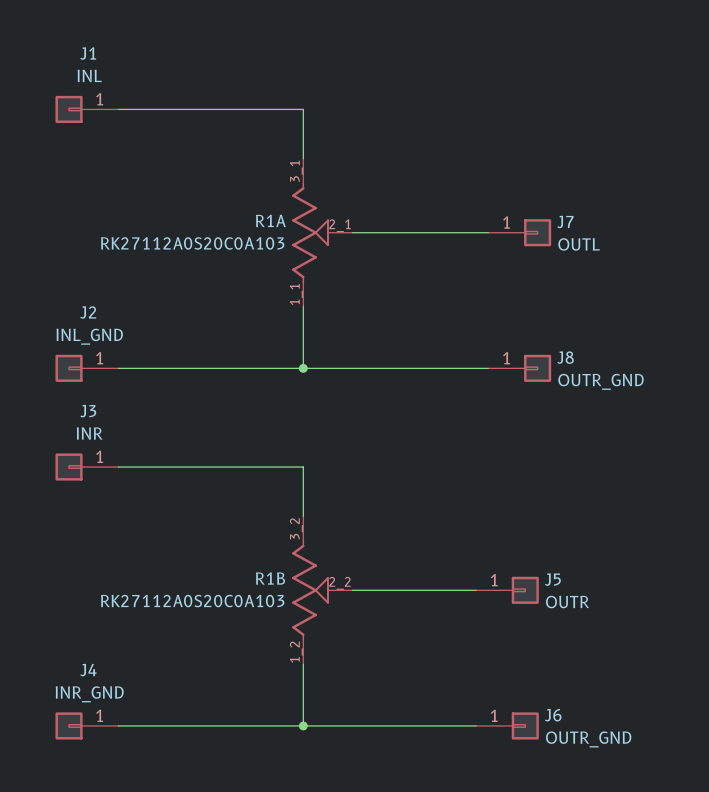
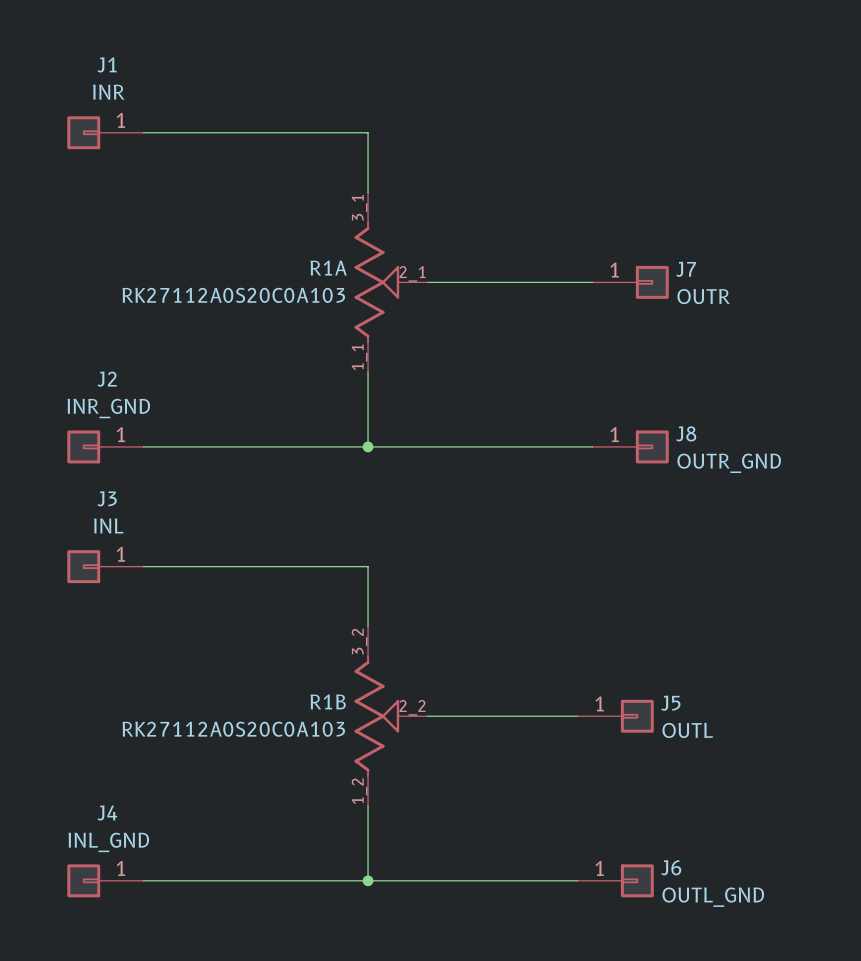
J1 value: INL (89, 75) -> INR (108, 92)
J7 value: OUTL (579, 244) -> OUTR (703, 296)
J2 value: INL_GND (89, 336) -> INR_GND (108, 408)
J3 value: INR (89, 433) -> INL (108, 525)
J5 value: OUTR (567, 602) -> OUTL (687, 730)
J4 value: INR_GND (89, 694) -> INL_GND (108, 842)
J6 value: OUTR_GND (588, 739) -> OUTL_GND (713, 897)

